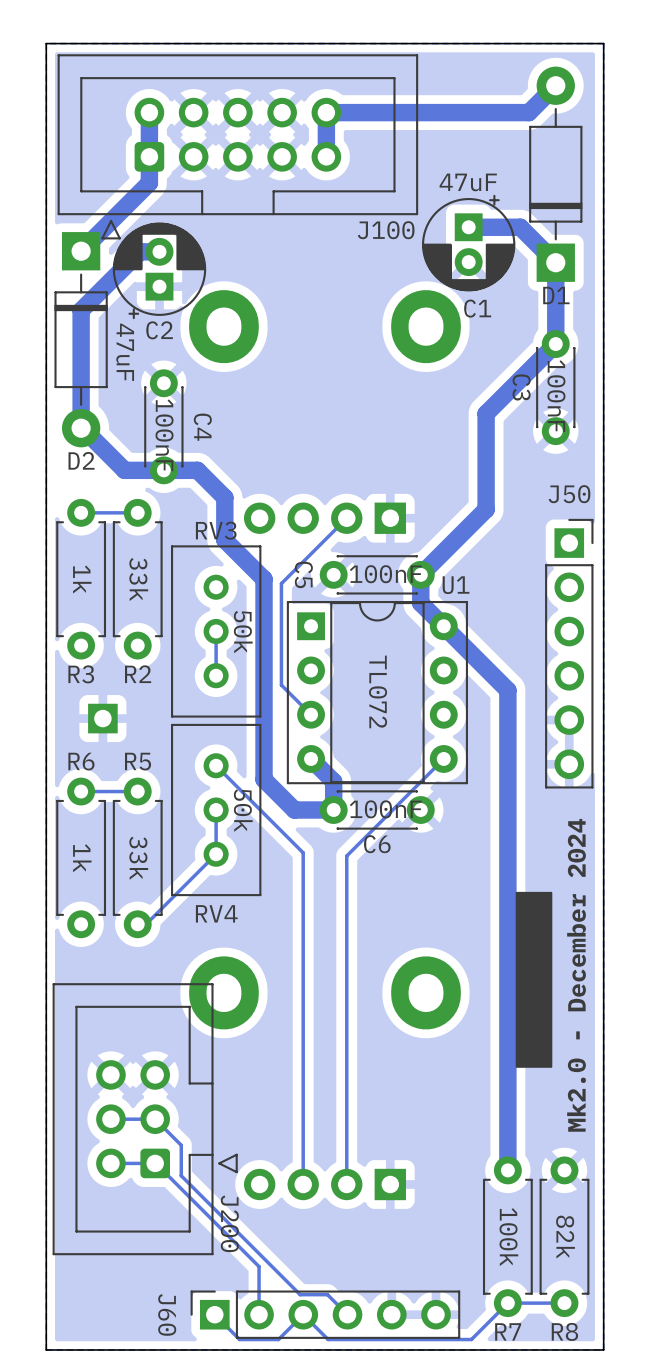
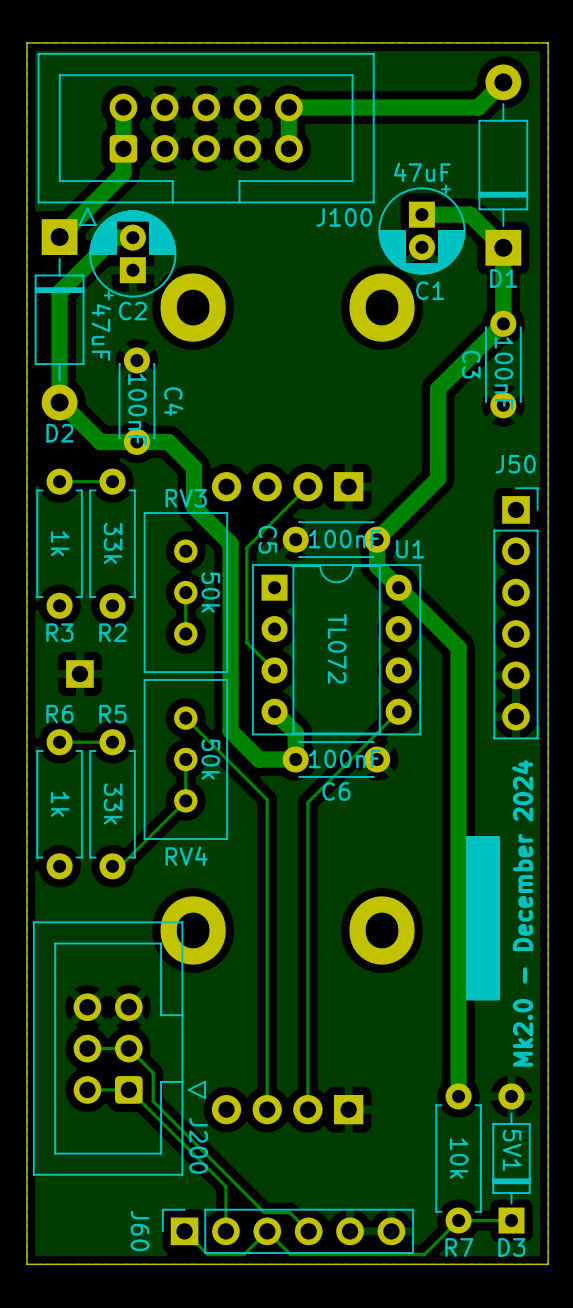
R8: 82k (564, 1236) -> none
D3: none -> 5V1 (511, 1158)
R7 value: 100k (508, 1237) -> 10k (459, 1158)

